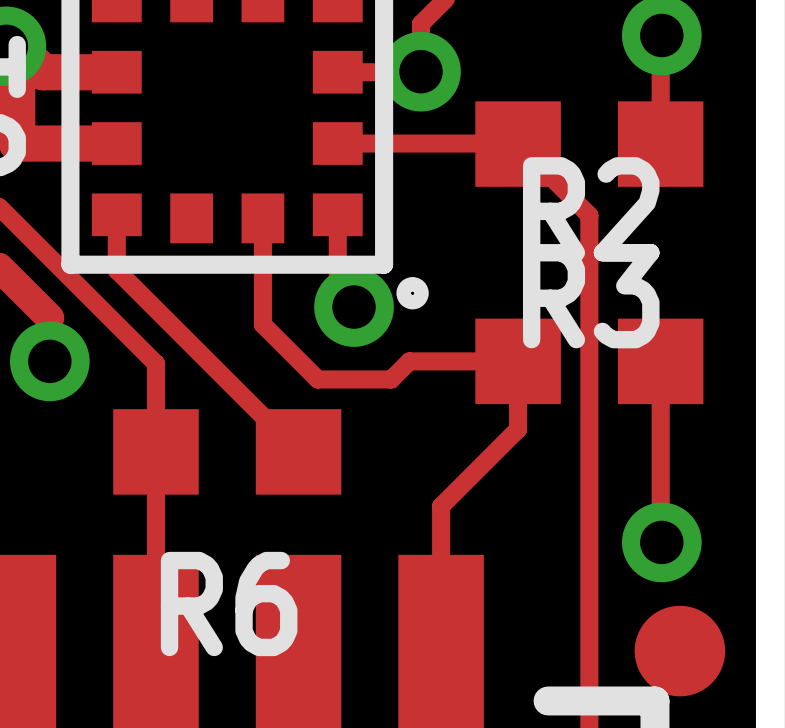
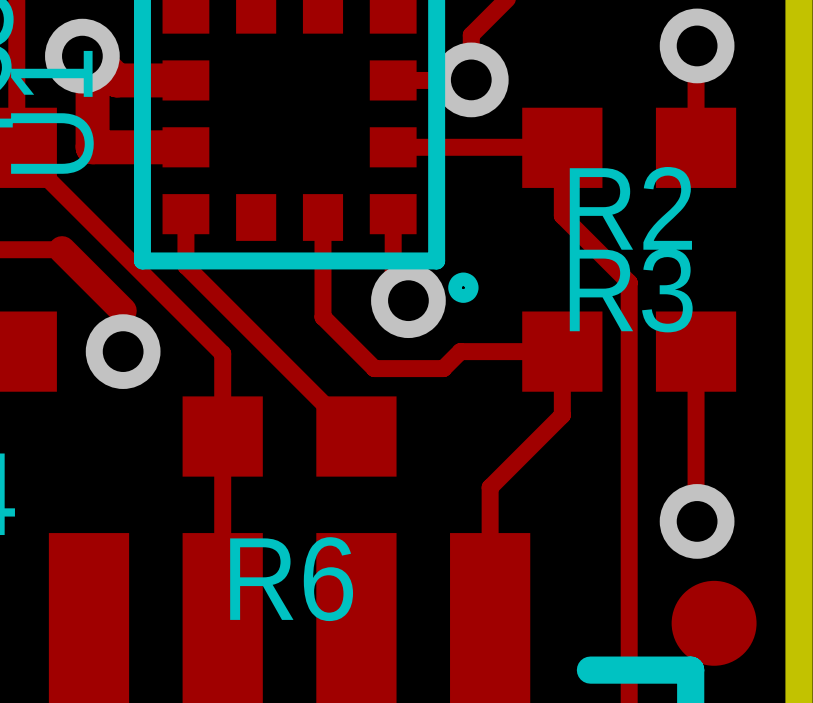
track: (518, 144) (589, 215) (589, 287) -> (562, 147) (562, 215) (629, 282)

